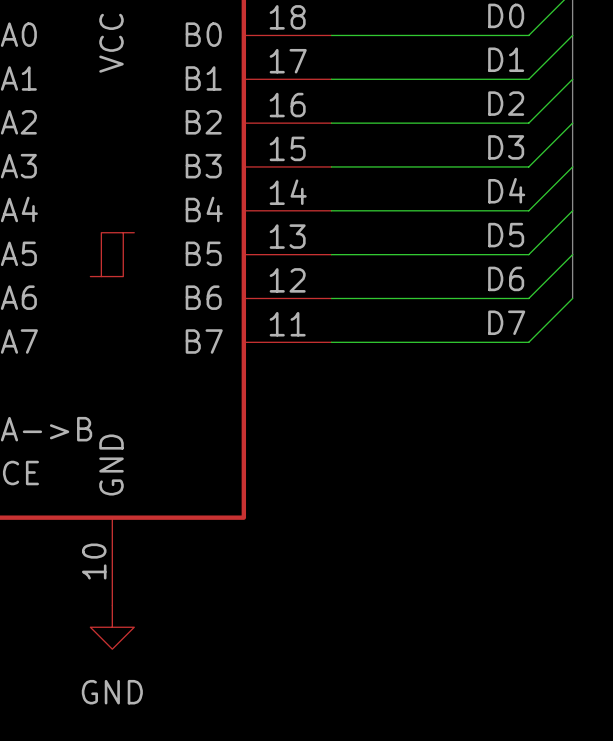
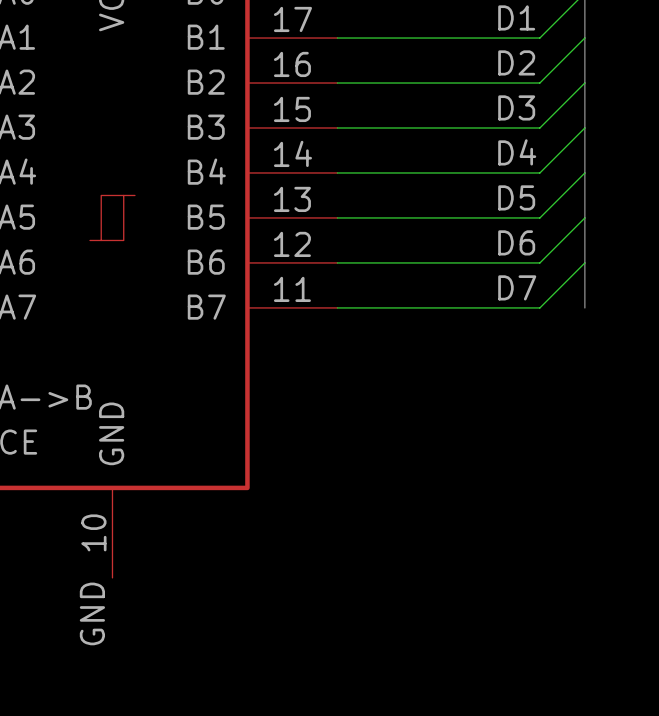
bus: none -> (584, 262) (584, 307)
power symbol: GND (112, 627) -> none
label: none -> GND (92, 613)

